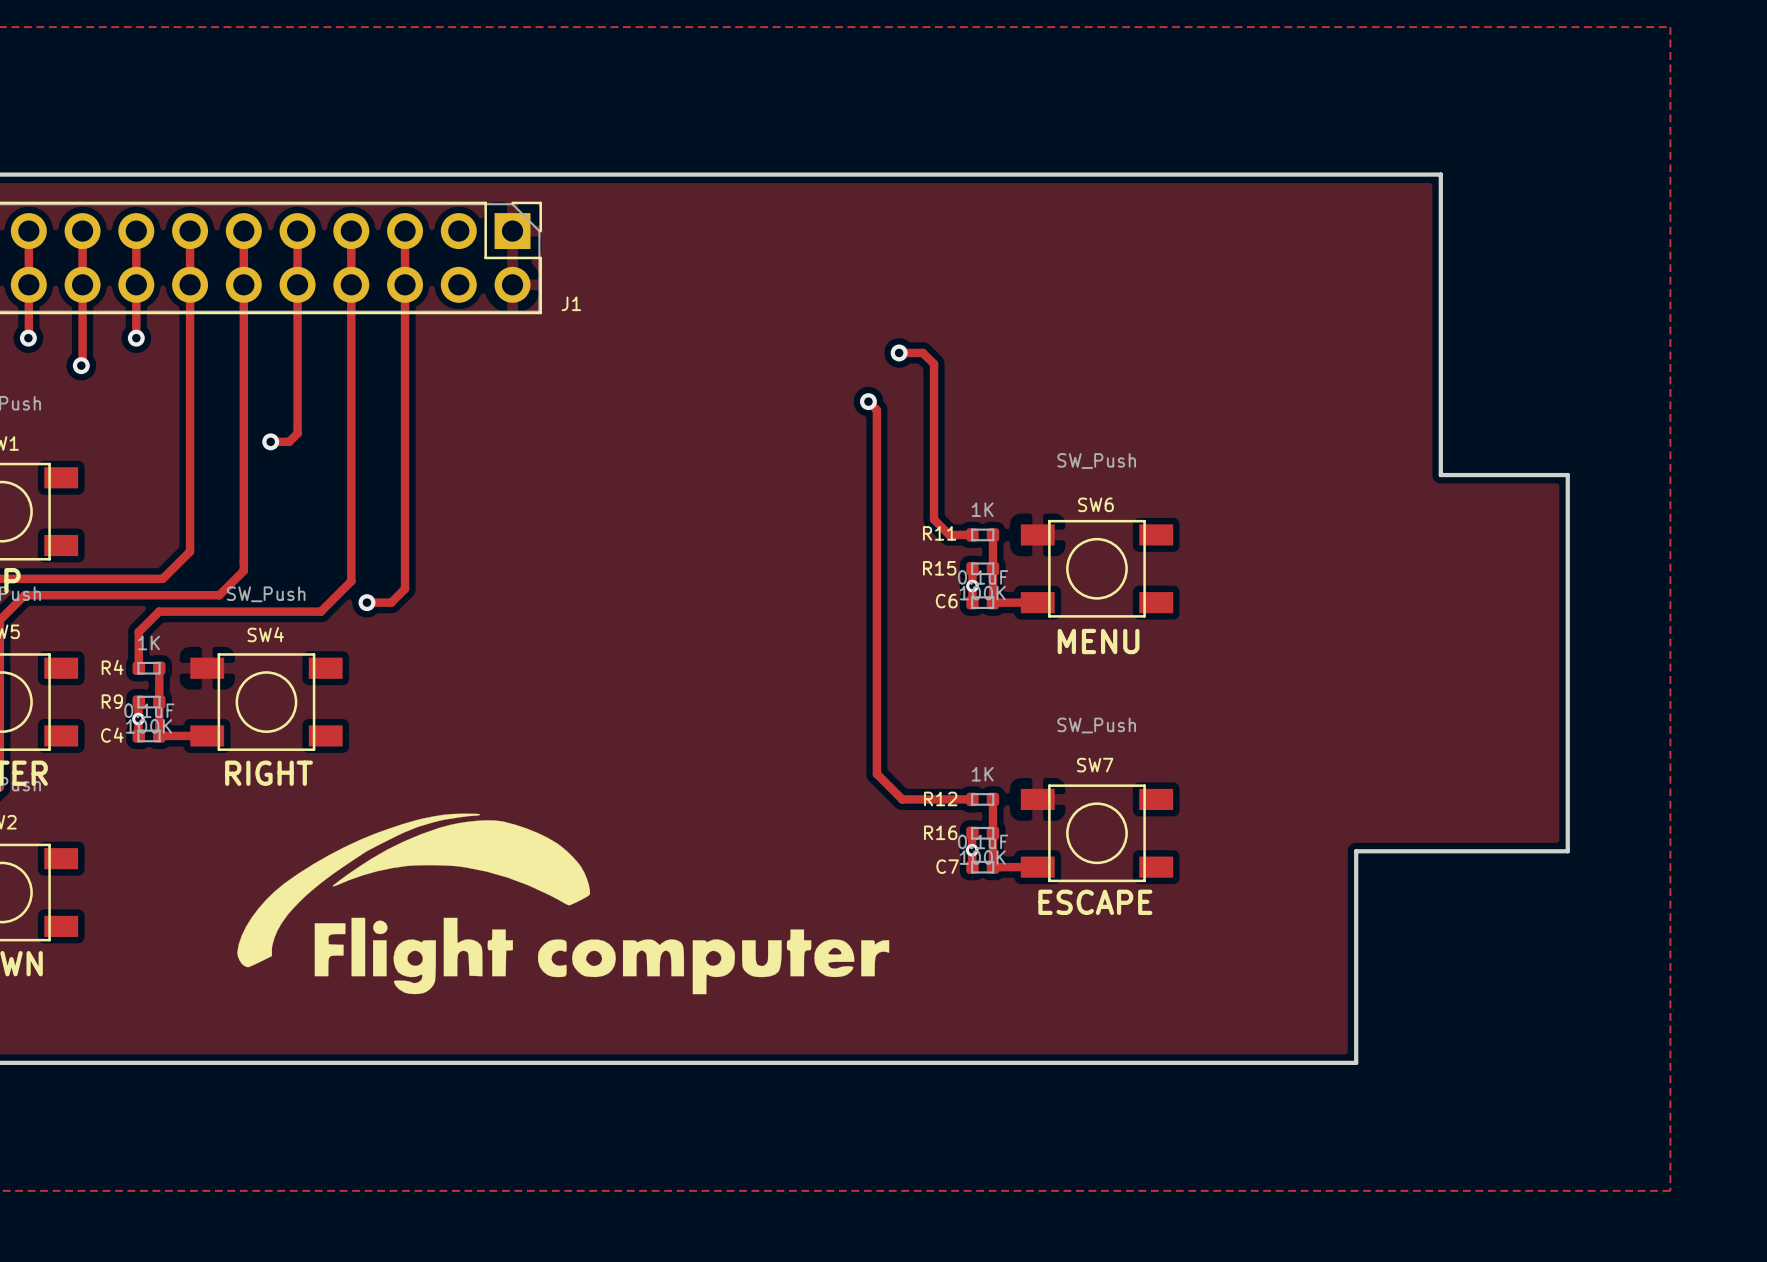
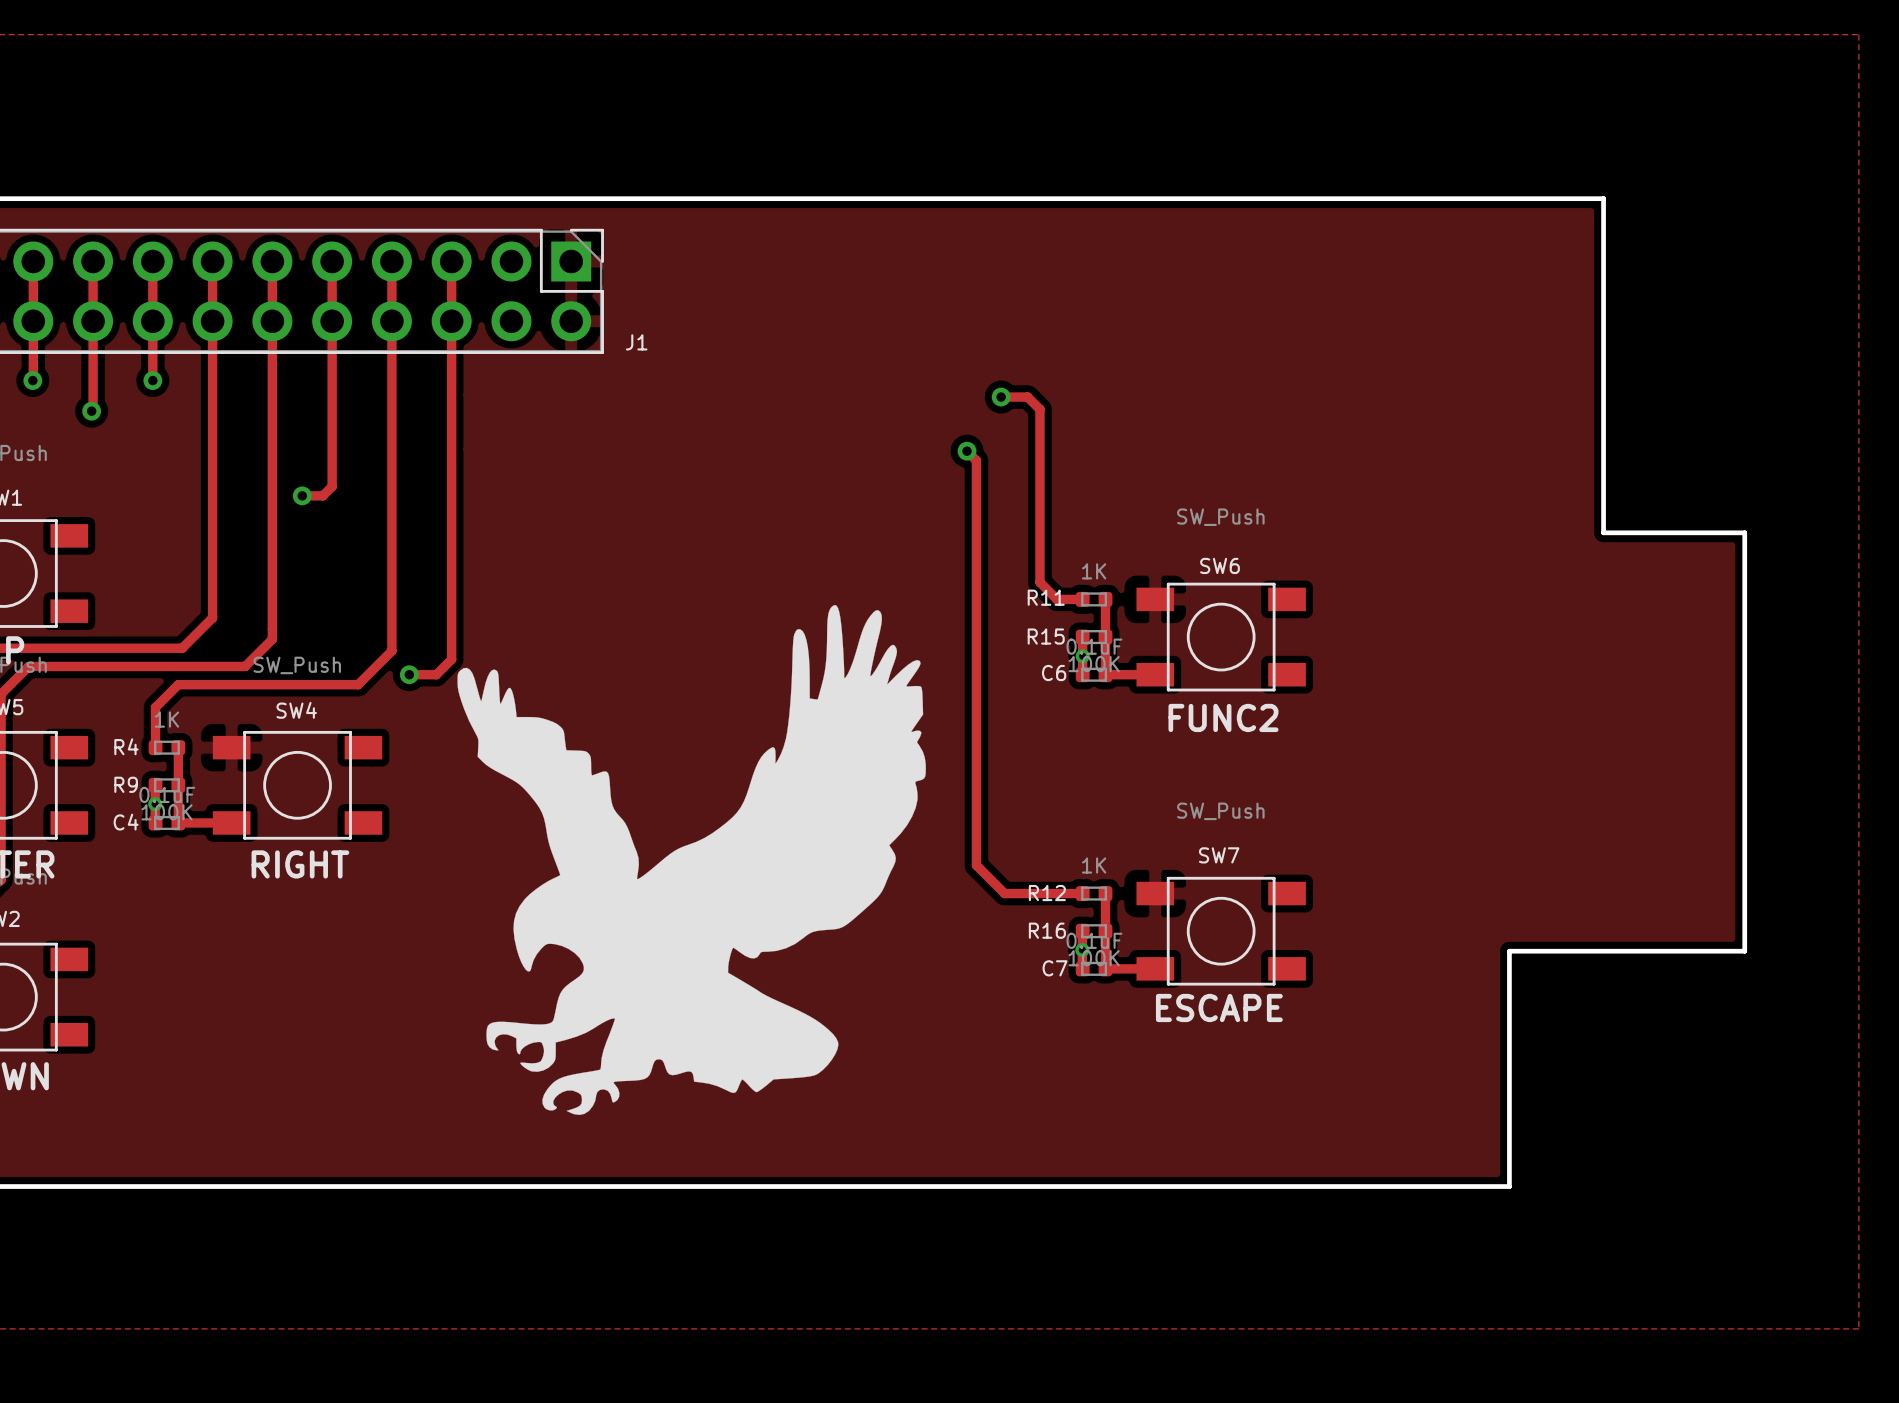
drawing: none -> [457, 604, 926, 1116]
text: MENU (1098, 641) -> FUNC2 (1223, 717)
drawing: [237, 813, 890, 995] -> none

